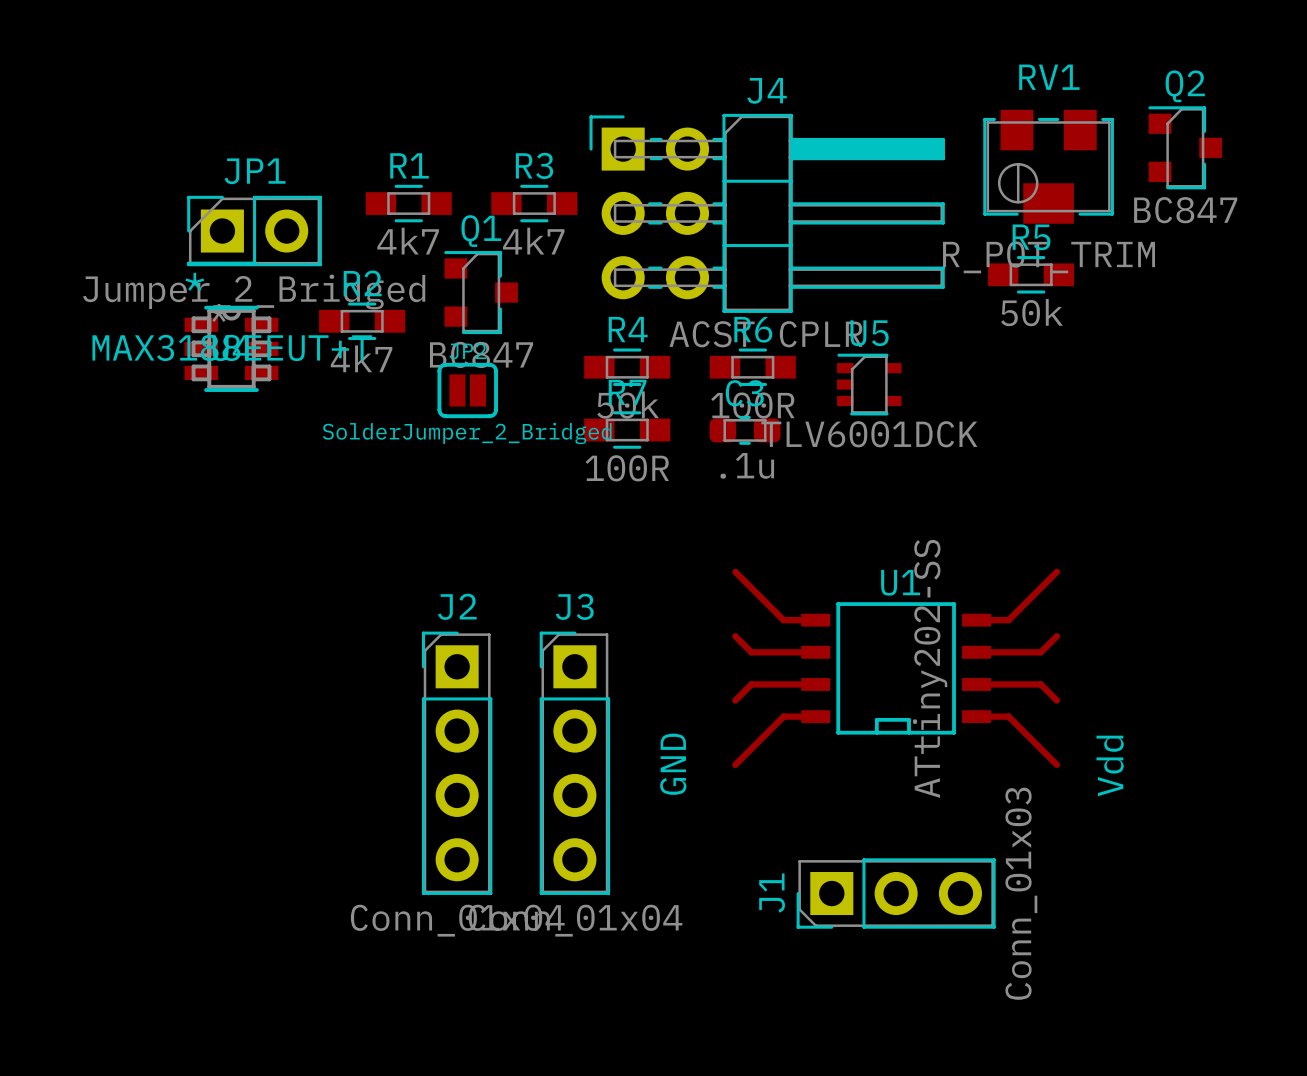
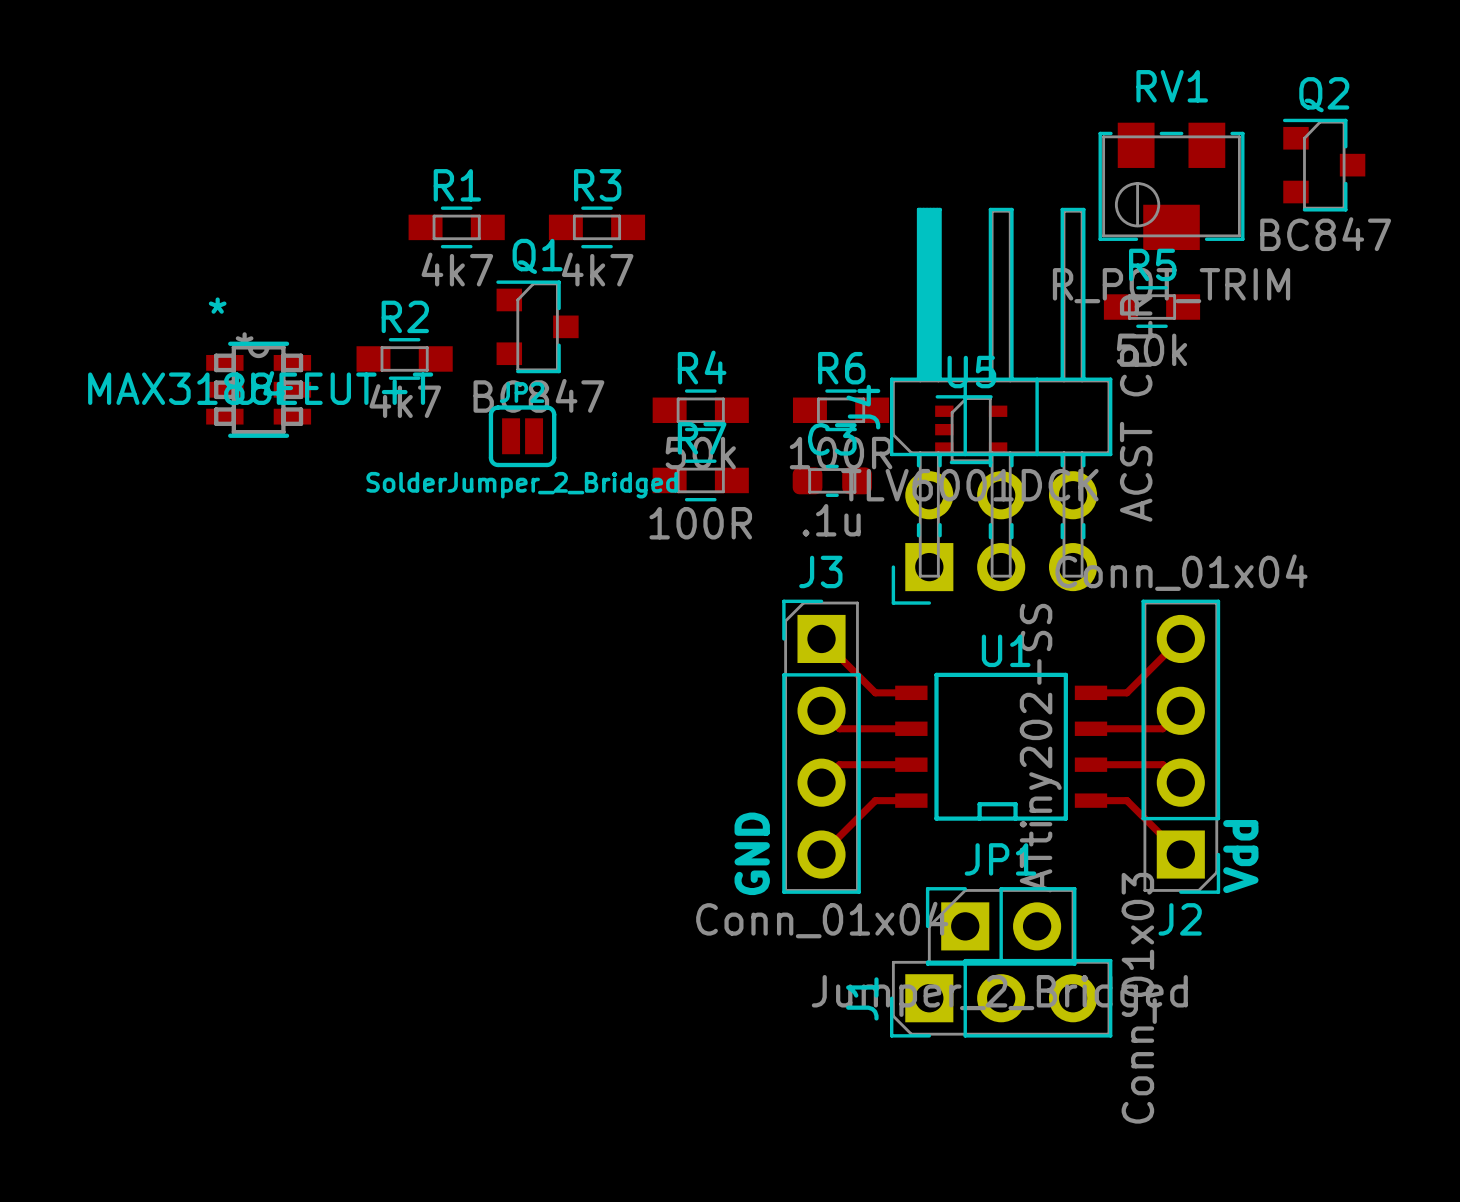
JP1 footprint: [187, 195, 322, 267] -> [925, 887, 1077, 966]
J4 rotation: 0° (767, 213) -> 90° counterclockwise (1001, 406)
J2 rotation: 0° (457, 763) -> 180° (1180, 746)
J2 position: (457, 763) -> (1180, 746)
J3 position: (574, 763) -> (821, 746)

